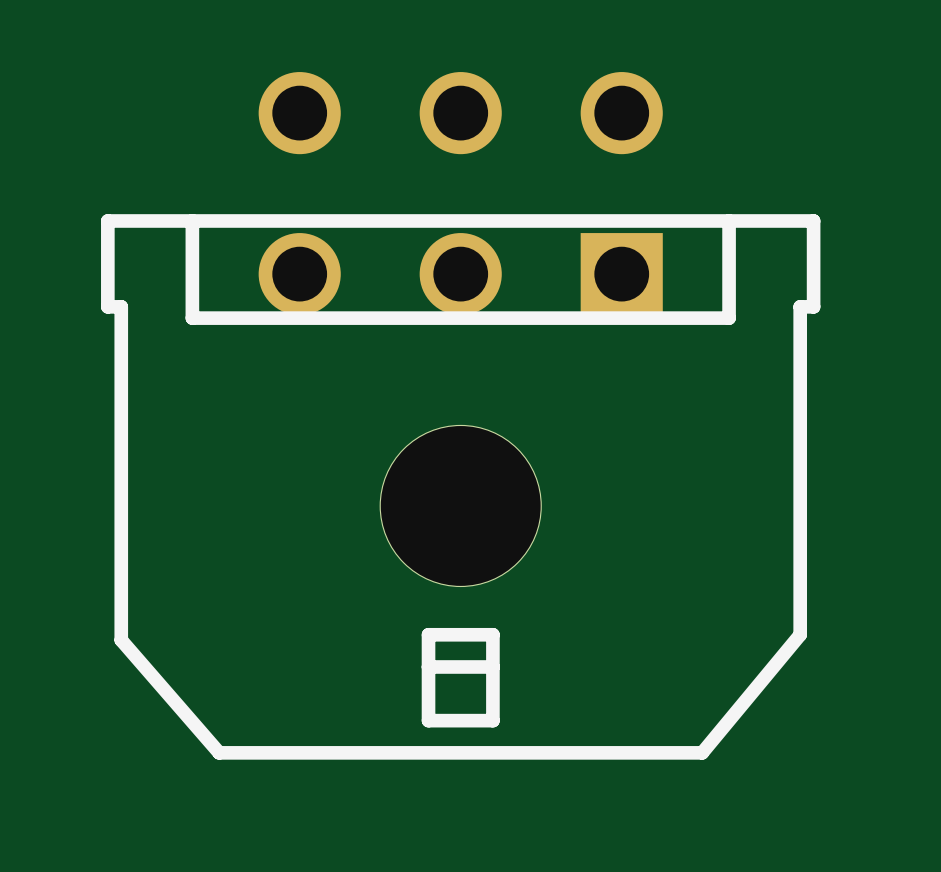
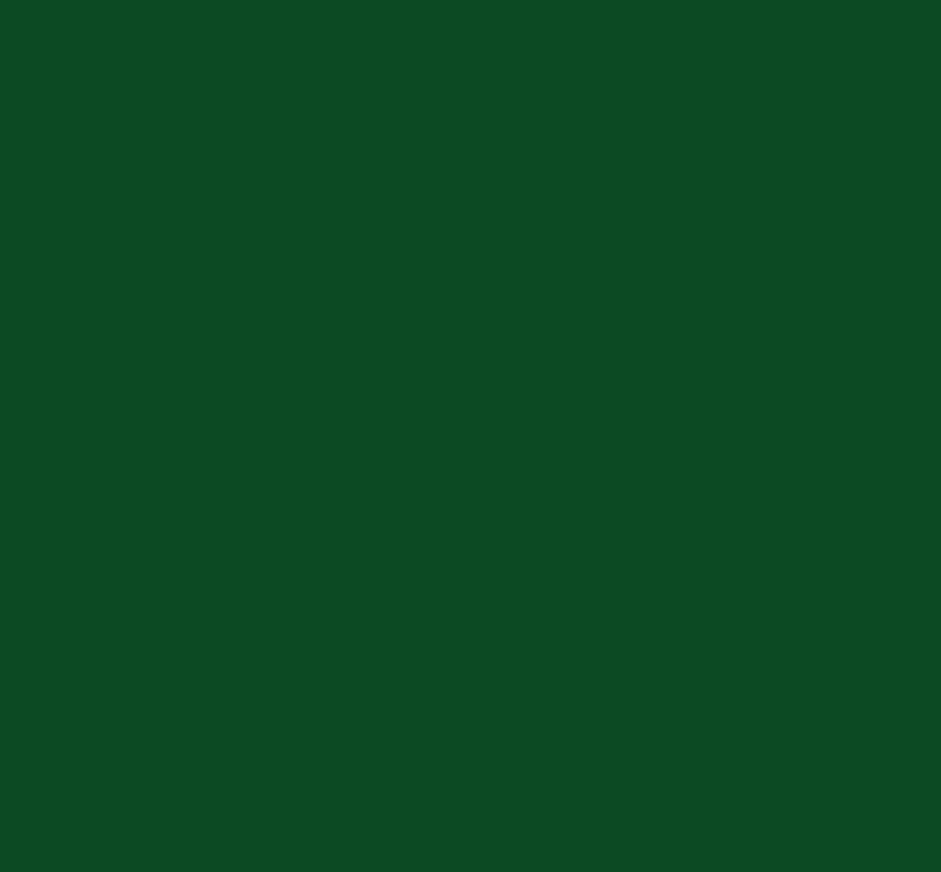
part: (460, 415) -> none

